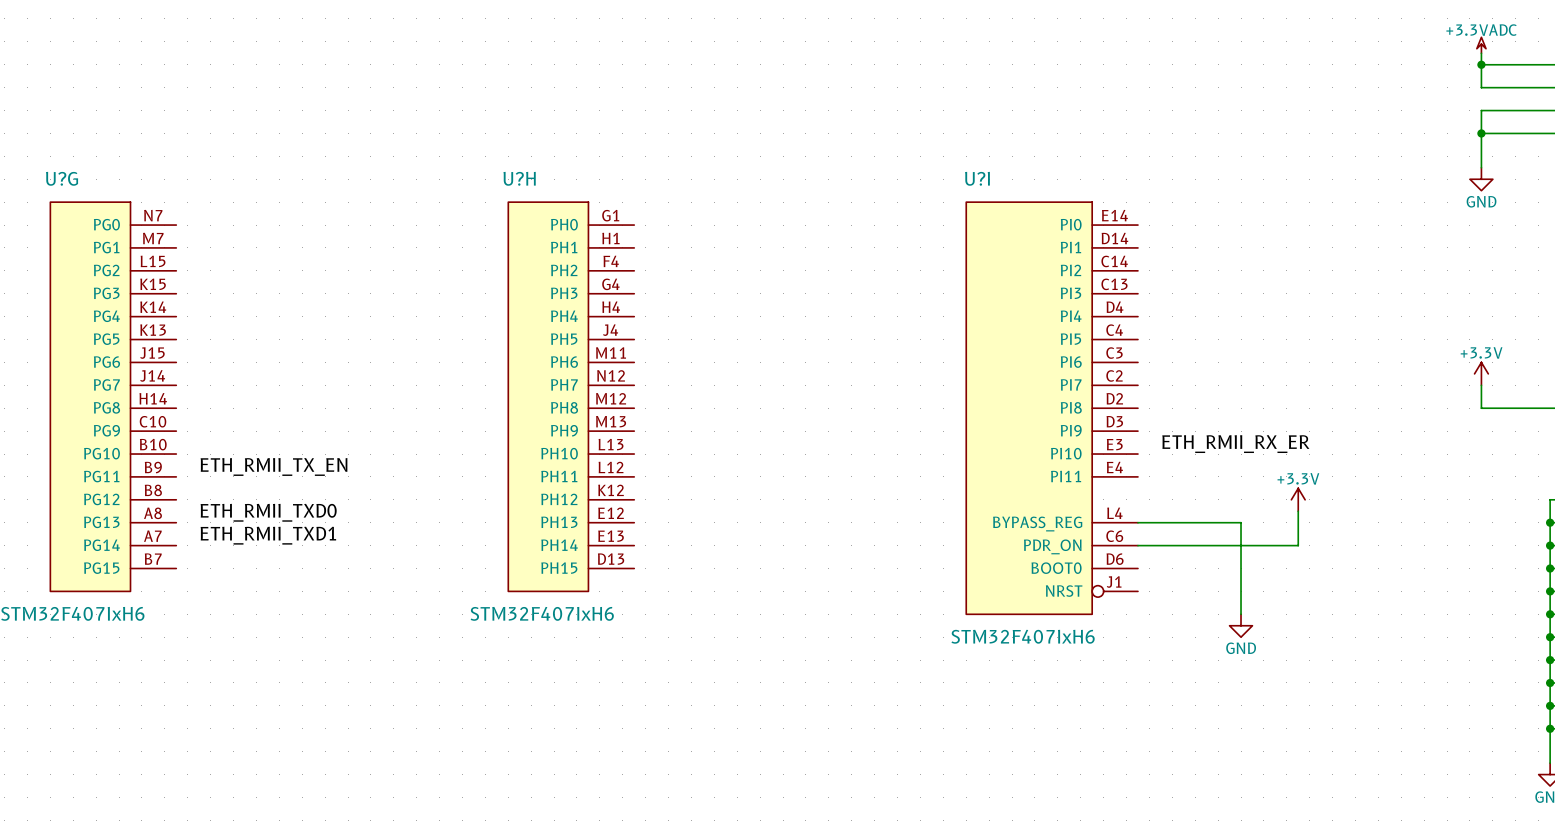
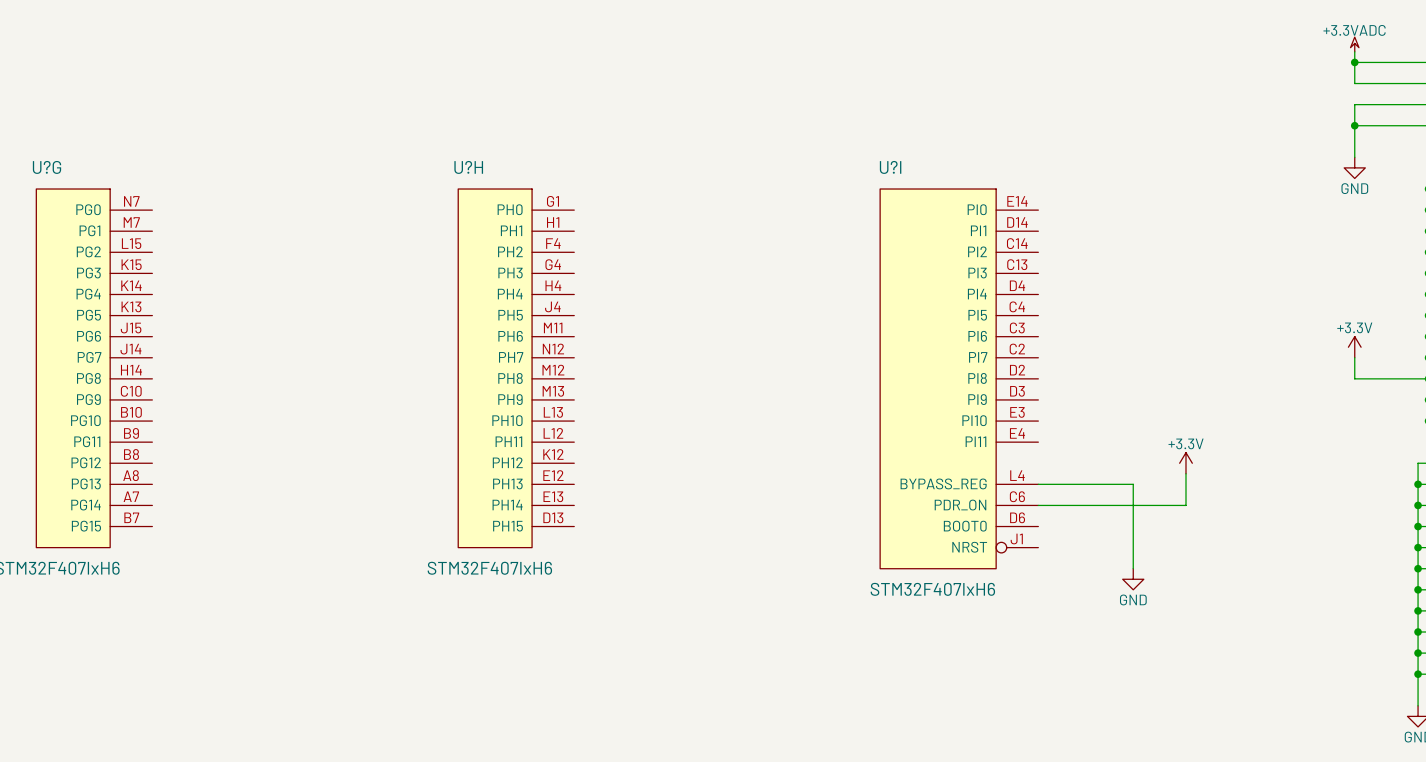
label: ETH_RMII_RX_ER (1235, 444) -> none
label: ETH_RMII_TX_EN (274, 466) -> none
label: ETH_RMII_TXD0 (268, 512) -> none
label: ETH_RMII_TXD1 (268, 535) -> none

